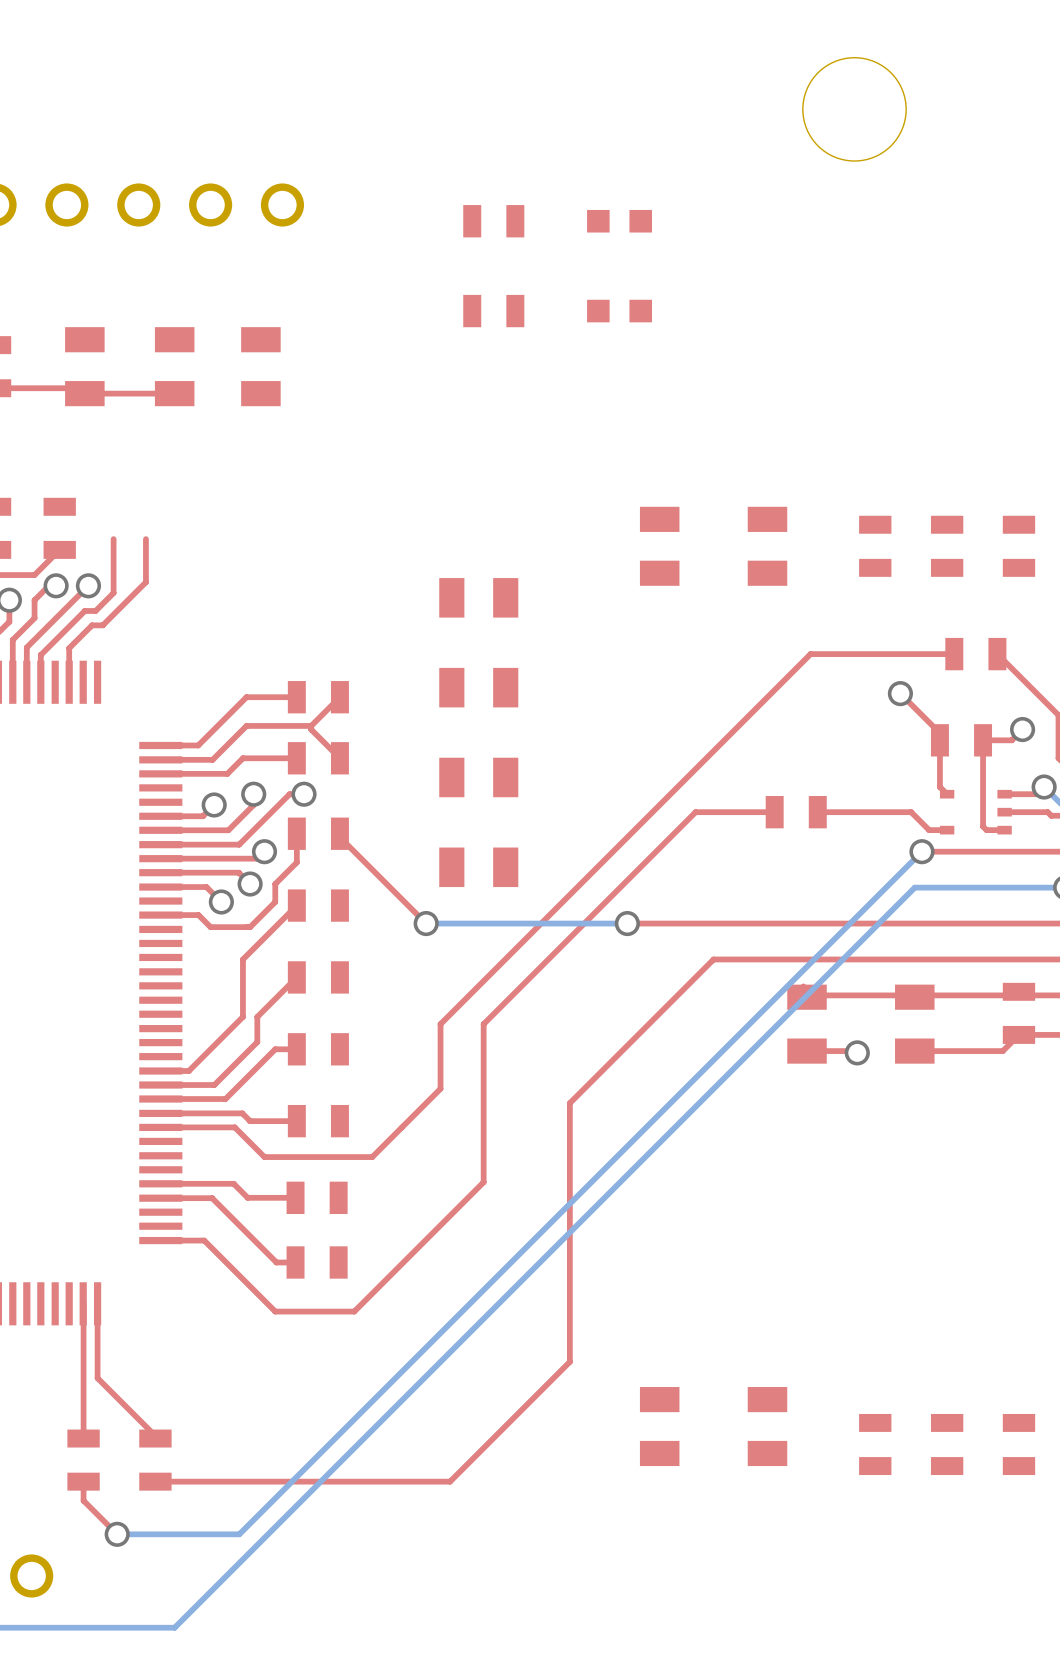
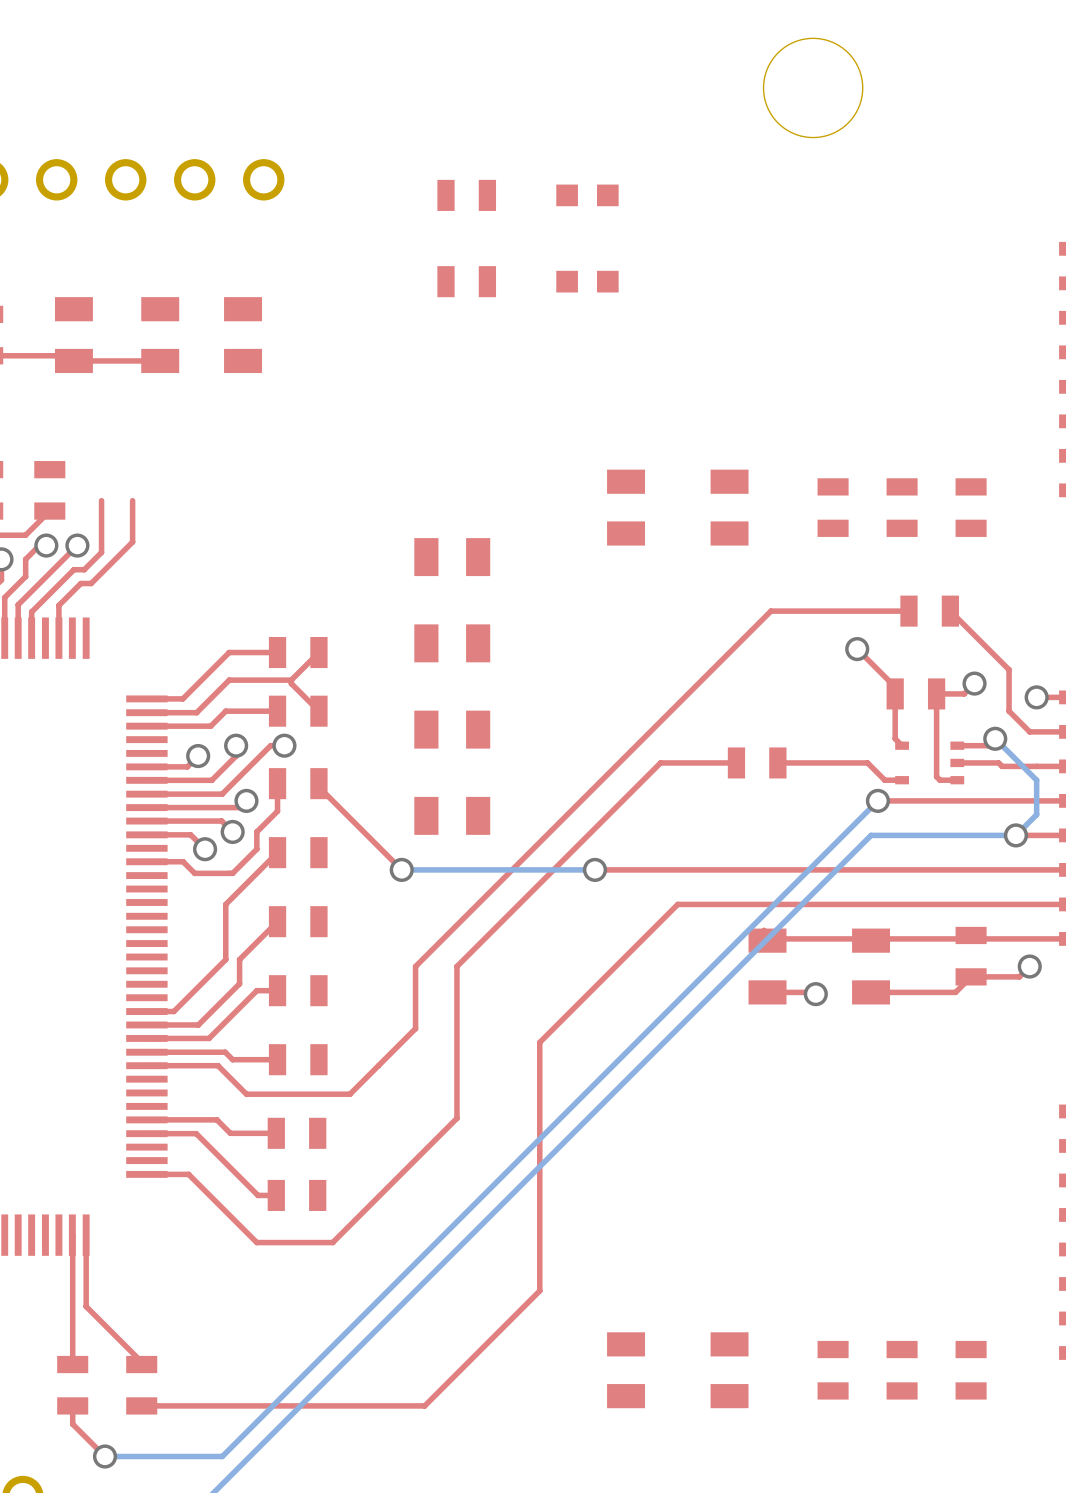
part position: (659, 1426) -> (626, 1370)
part position: (767, 1426) -> (729, 1370)

